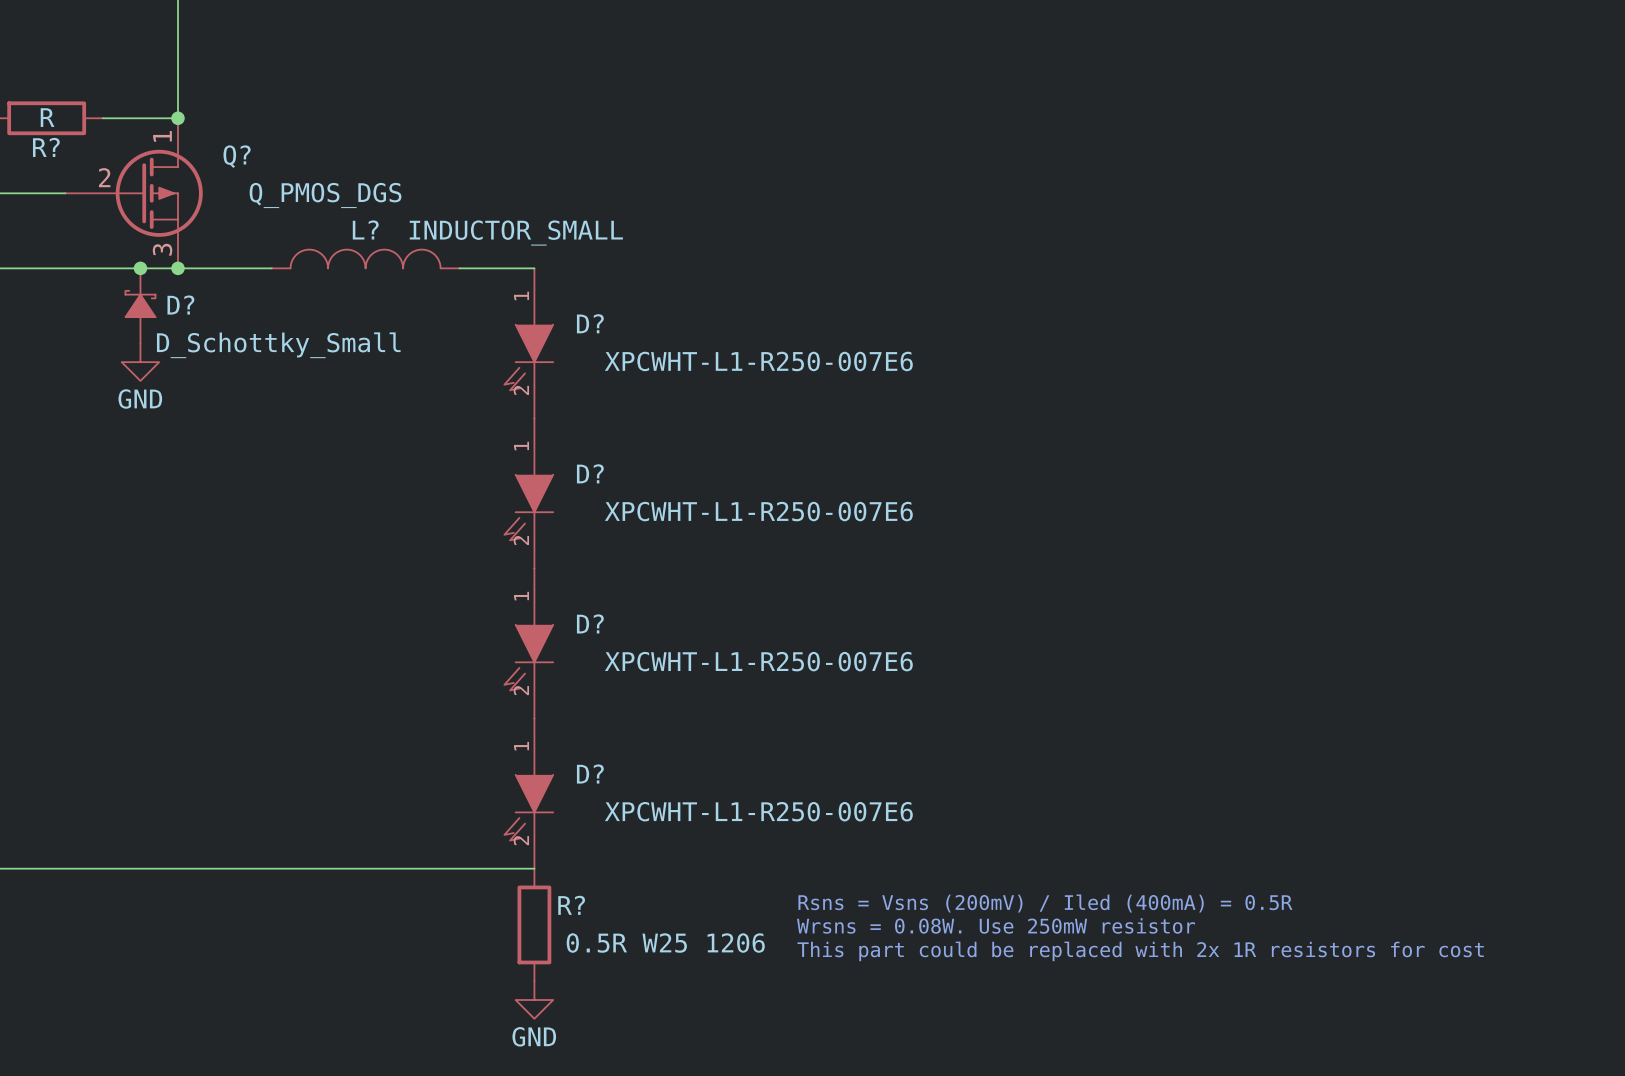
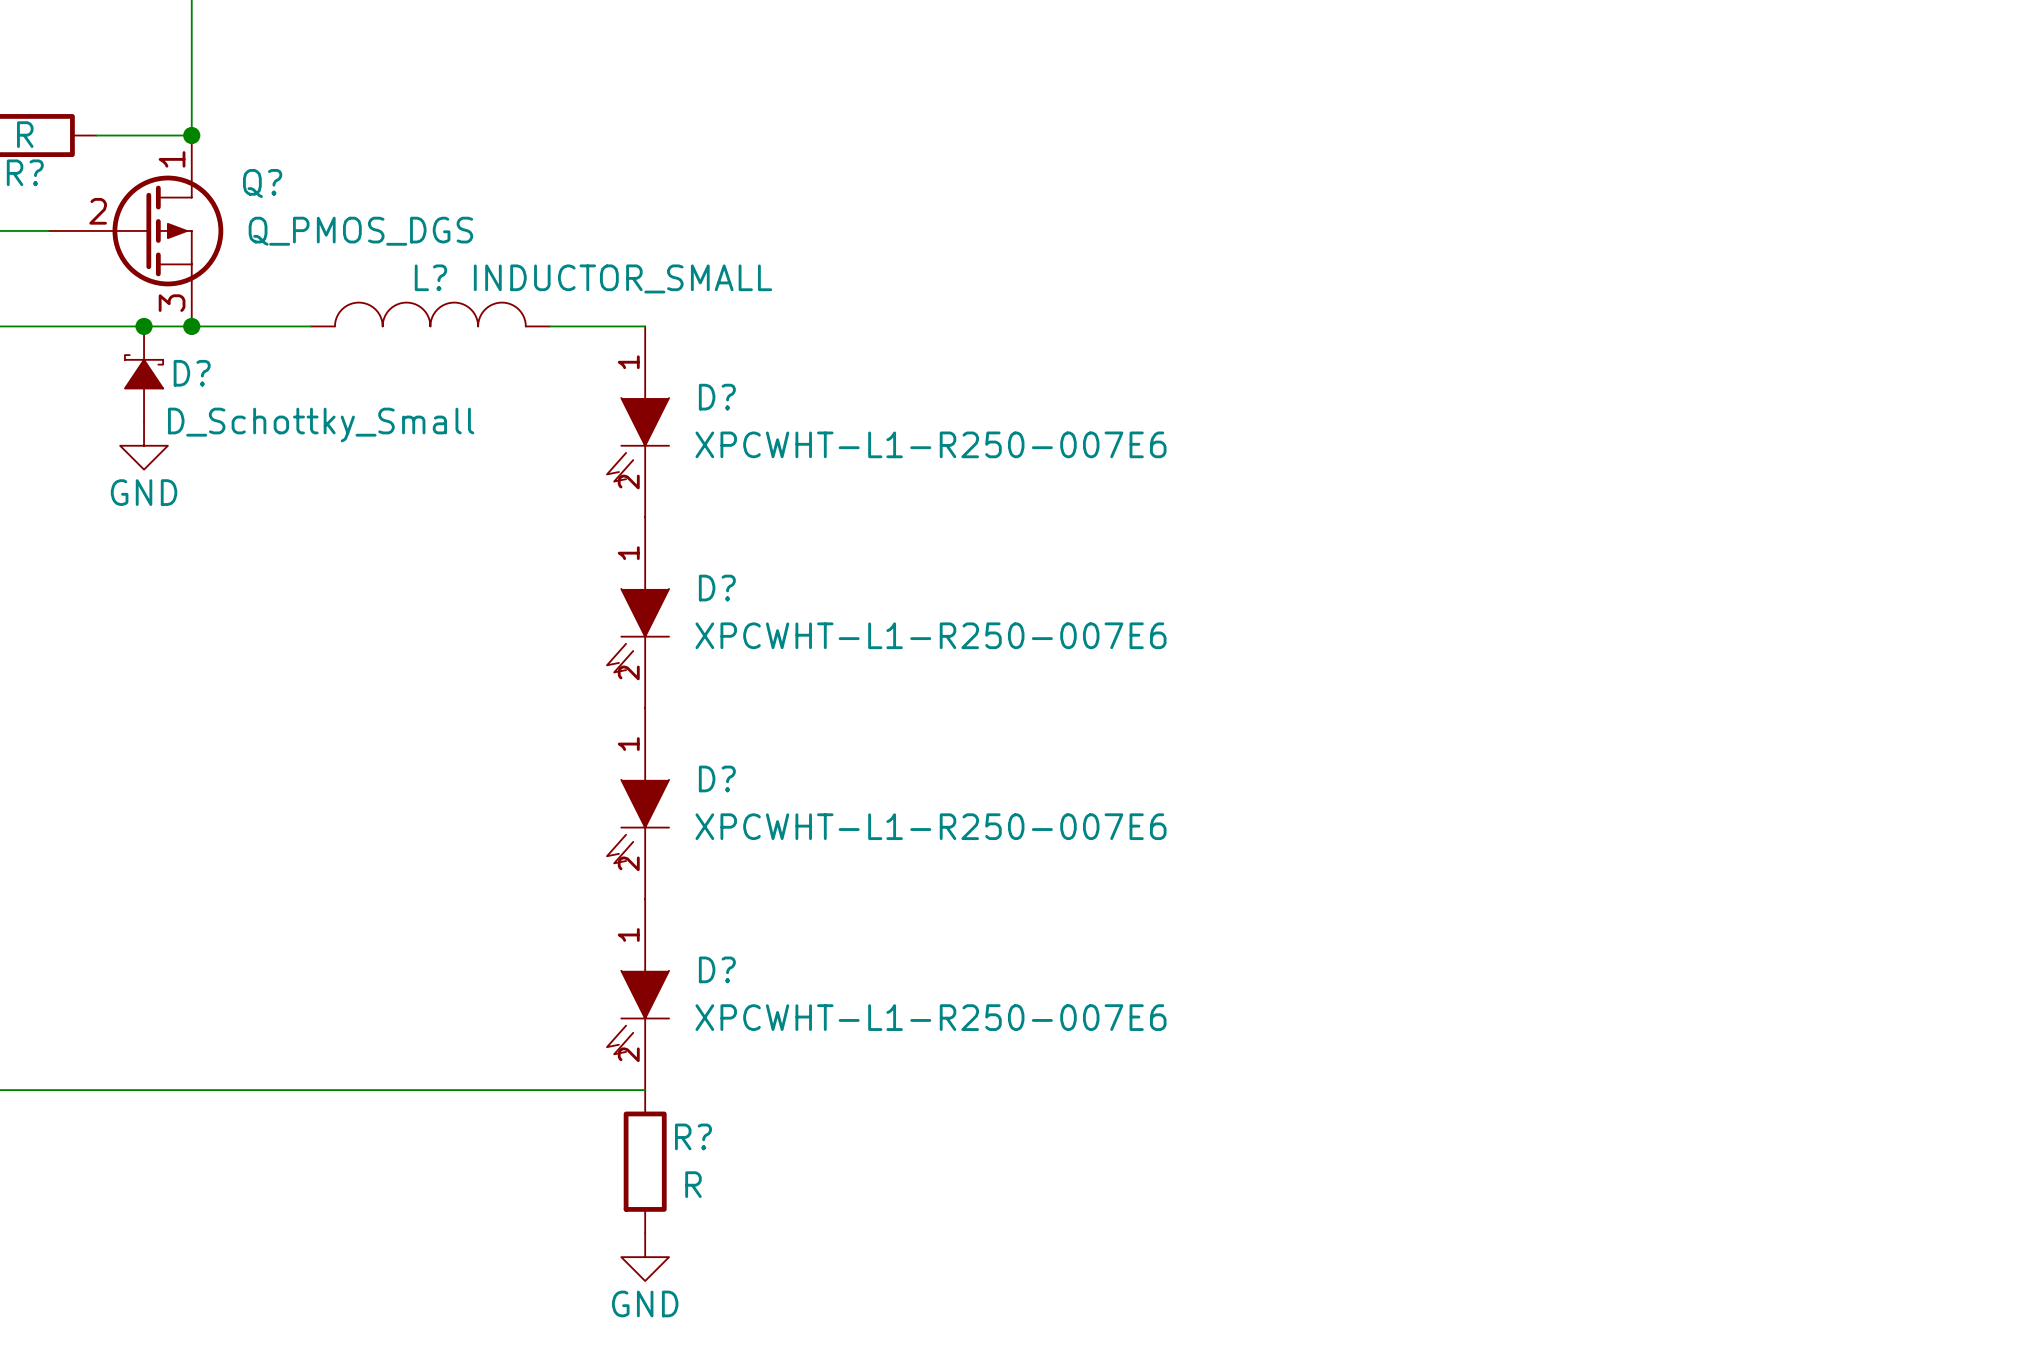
text: Rsns = Vsns (200mV) / Iled (400mA) = 0.5R (1045, 903) -> none
text: Wrsns = 0.08W. Use 250mW resistor (996, 925) -> none
R? value: 0.5R W25 1206 (665, 943) -> R (693, 1184)
text: This part could be replaced with 2x 1R resistors for cost (1140, 951) -> none

